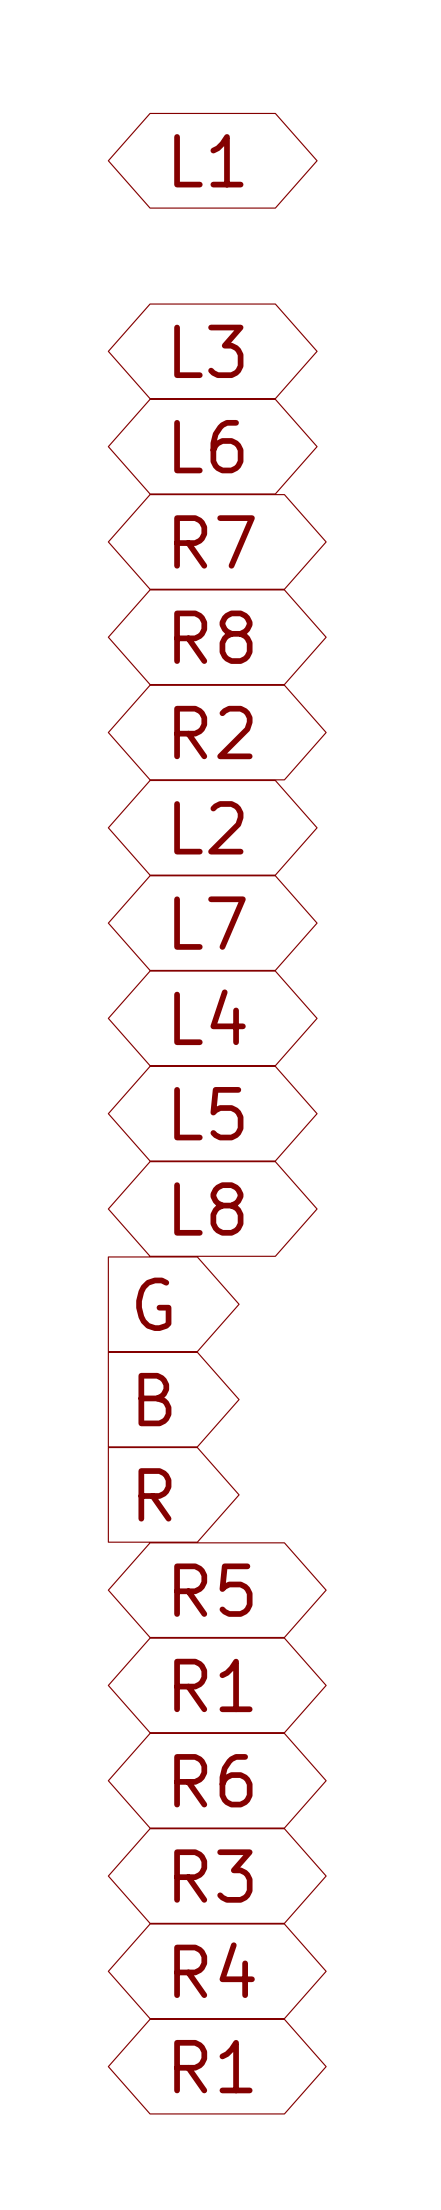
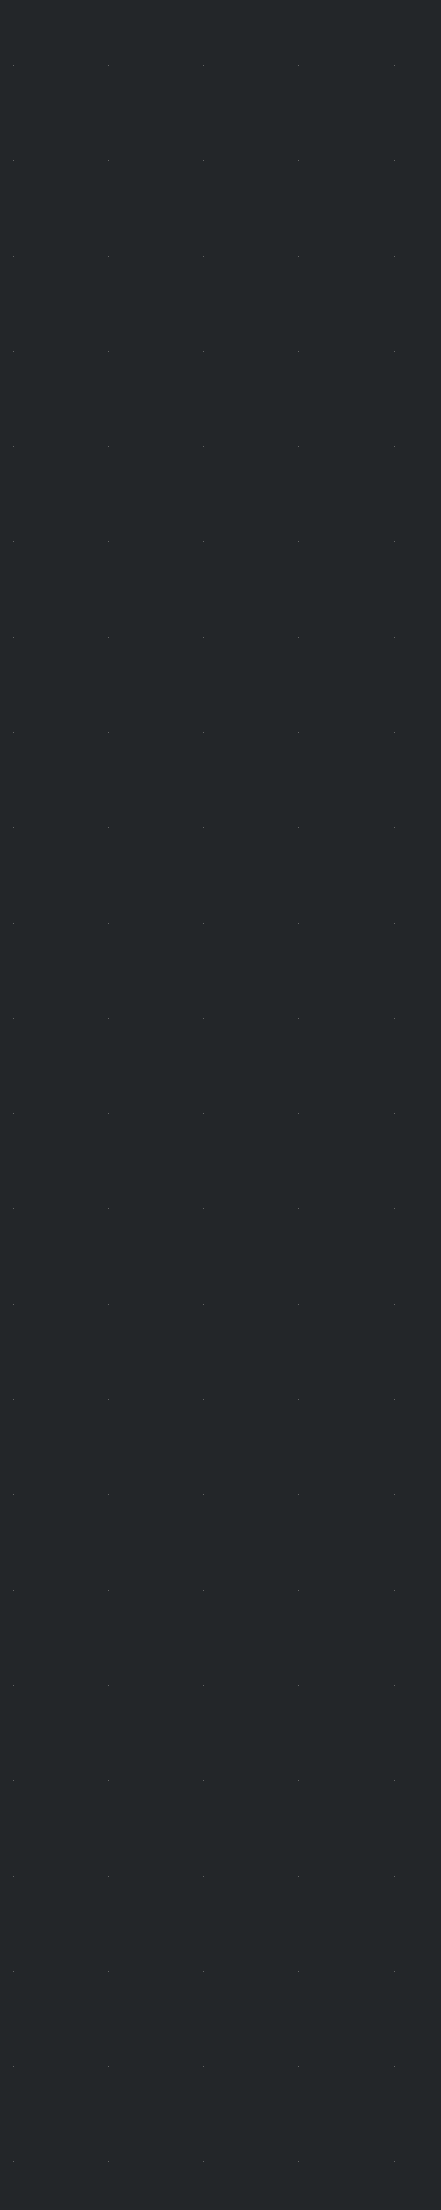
global label: L1 (208, 160) -> none
global label: L3 (208, 351) -> none
global label: L6 (208, 446) -> none
global label: R7 (214, 541) -> none
global label: R8 (213, 637) -> none
global label: R2 (213, 732) -> none
global label: L2 (208, 827) -> none
global label: L7 (209, 923) -> none
global label: L4 (209, 1017) -> none
global label: L5 (208, 1113) -> none
global label: L8 (208, 1208) -> none
global label: G (153, 1304) -> none
global label: B (154, 1399) -> none
global label: R (154, 1494) -> none
global label: R5 (213, 1590) -> none
global label: R1 (213, 1685) -> none
global label: R6 (213, 1780) -> none
global label: R3 (213, 1876) -> none
global label: R4 (214, 1970) -> none
global label: R1 (213, 2066) -> none

